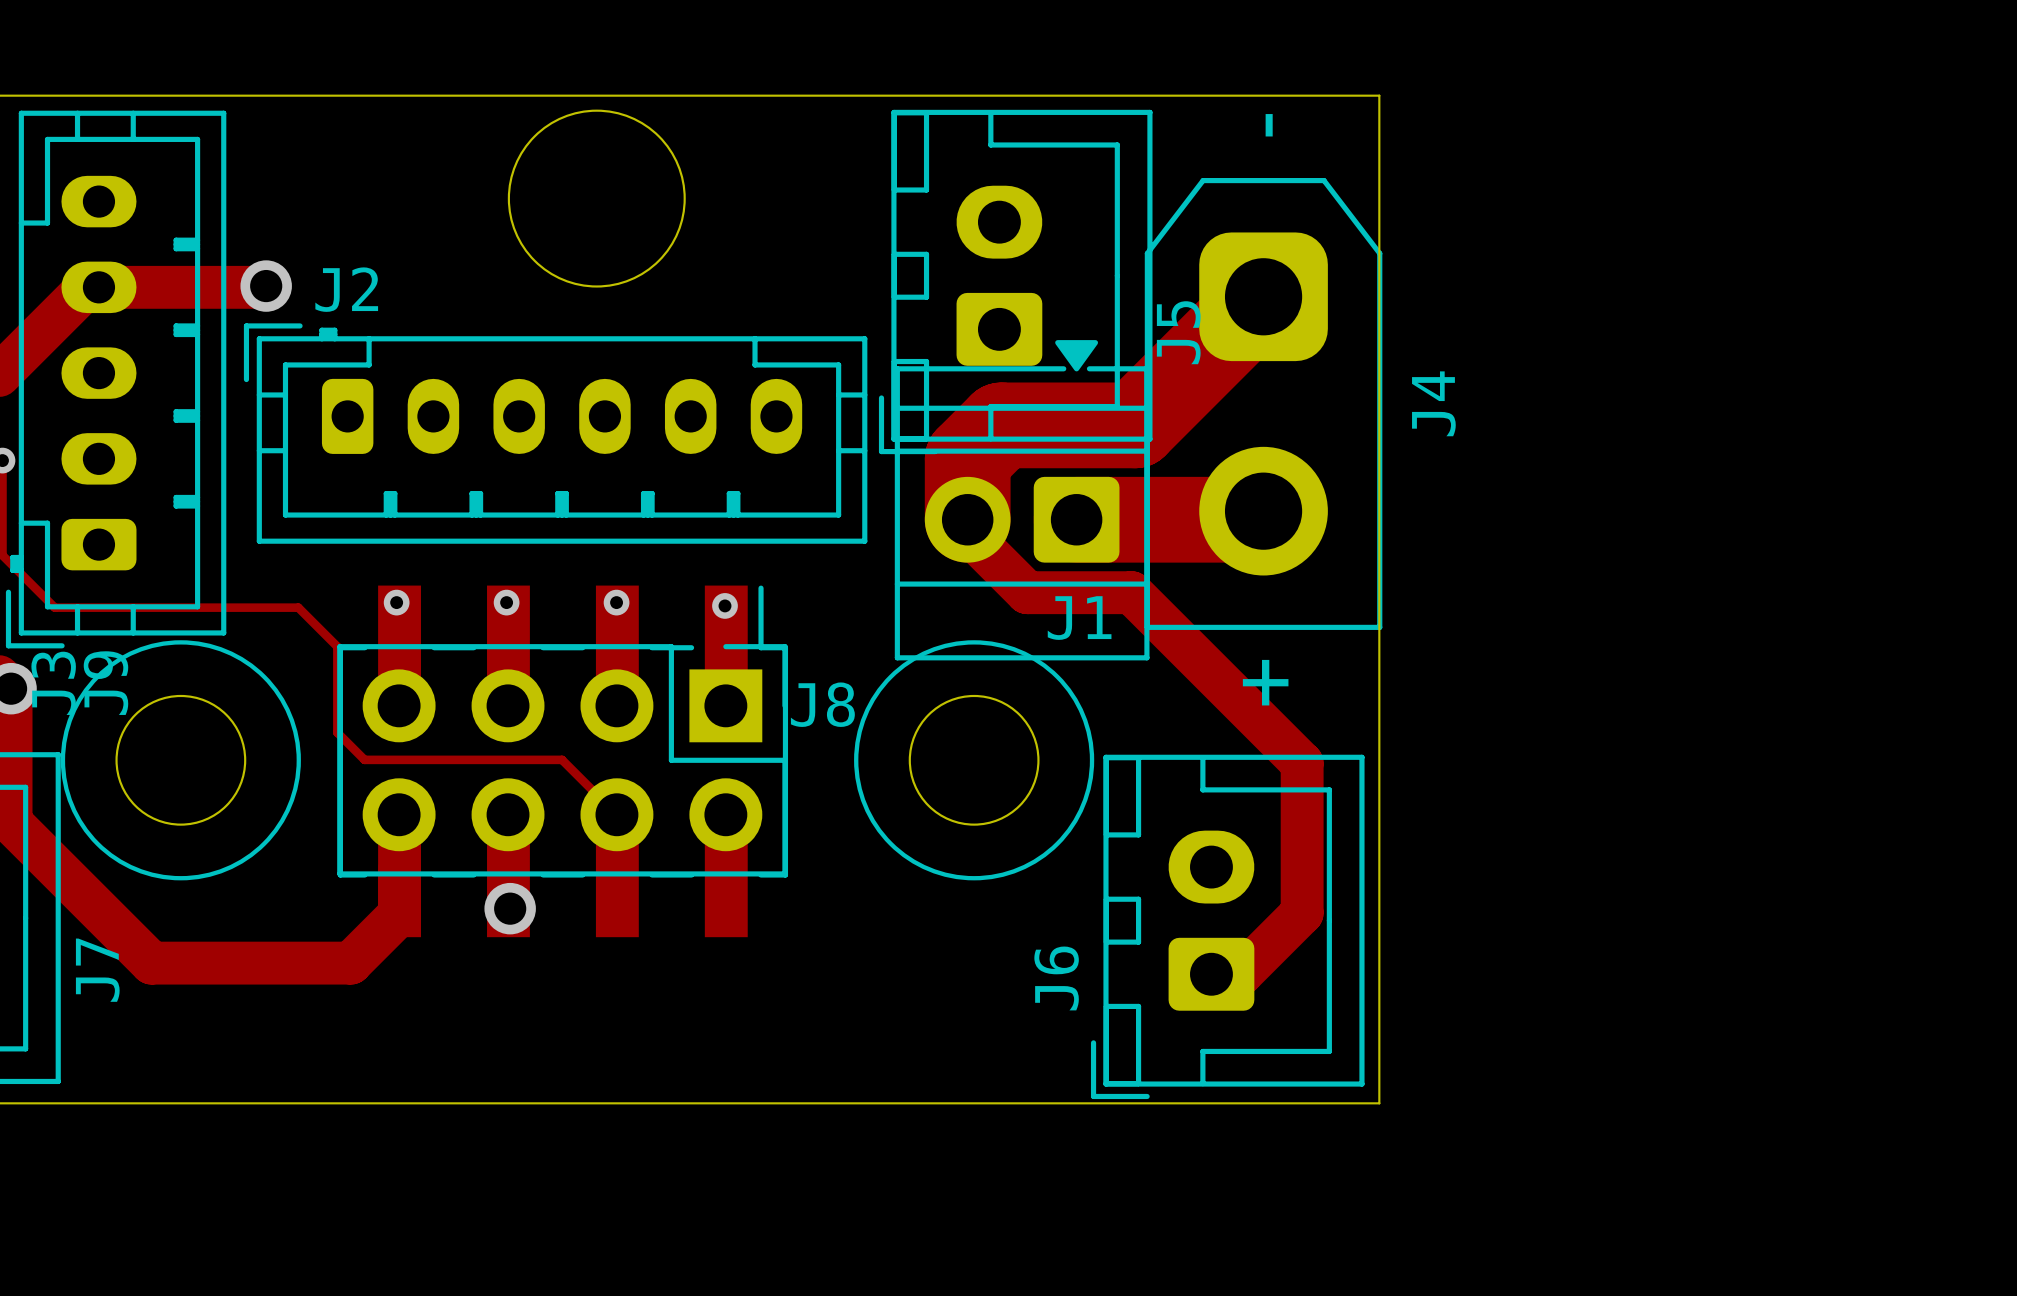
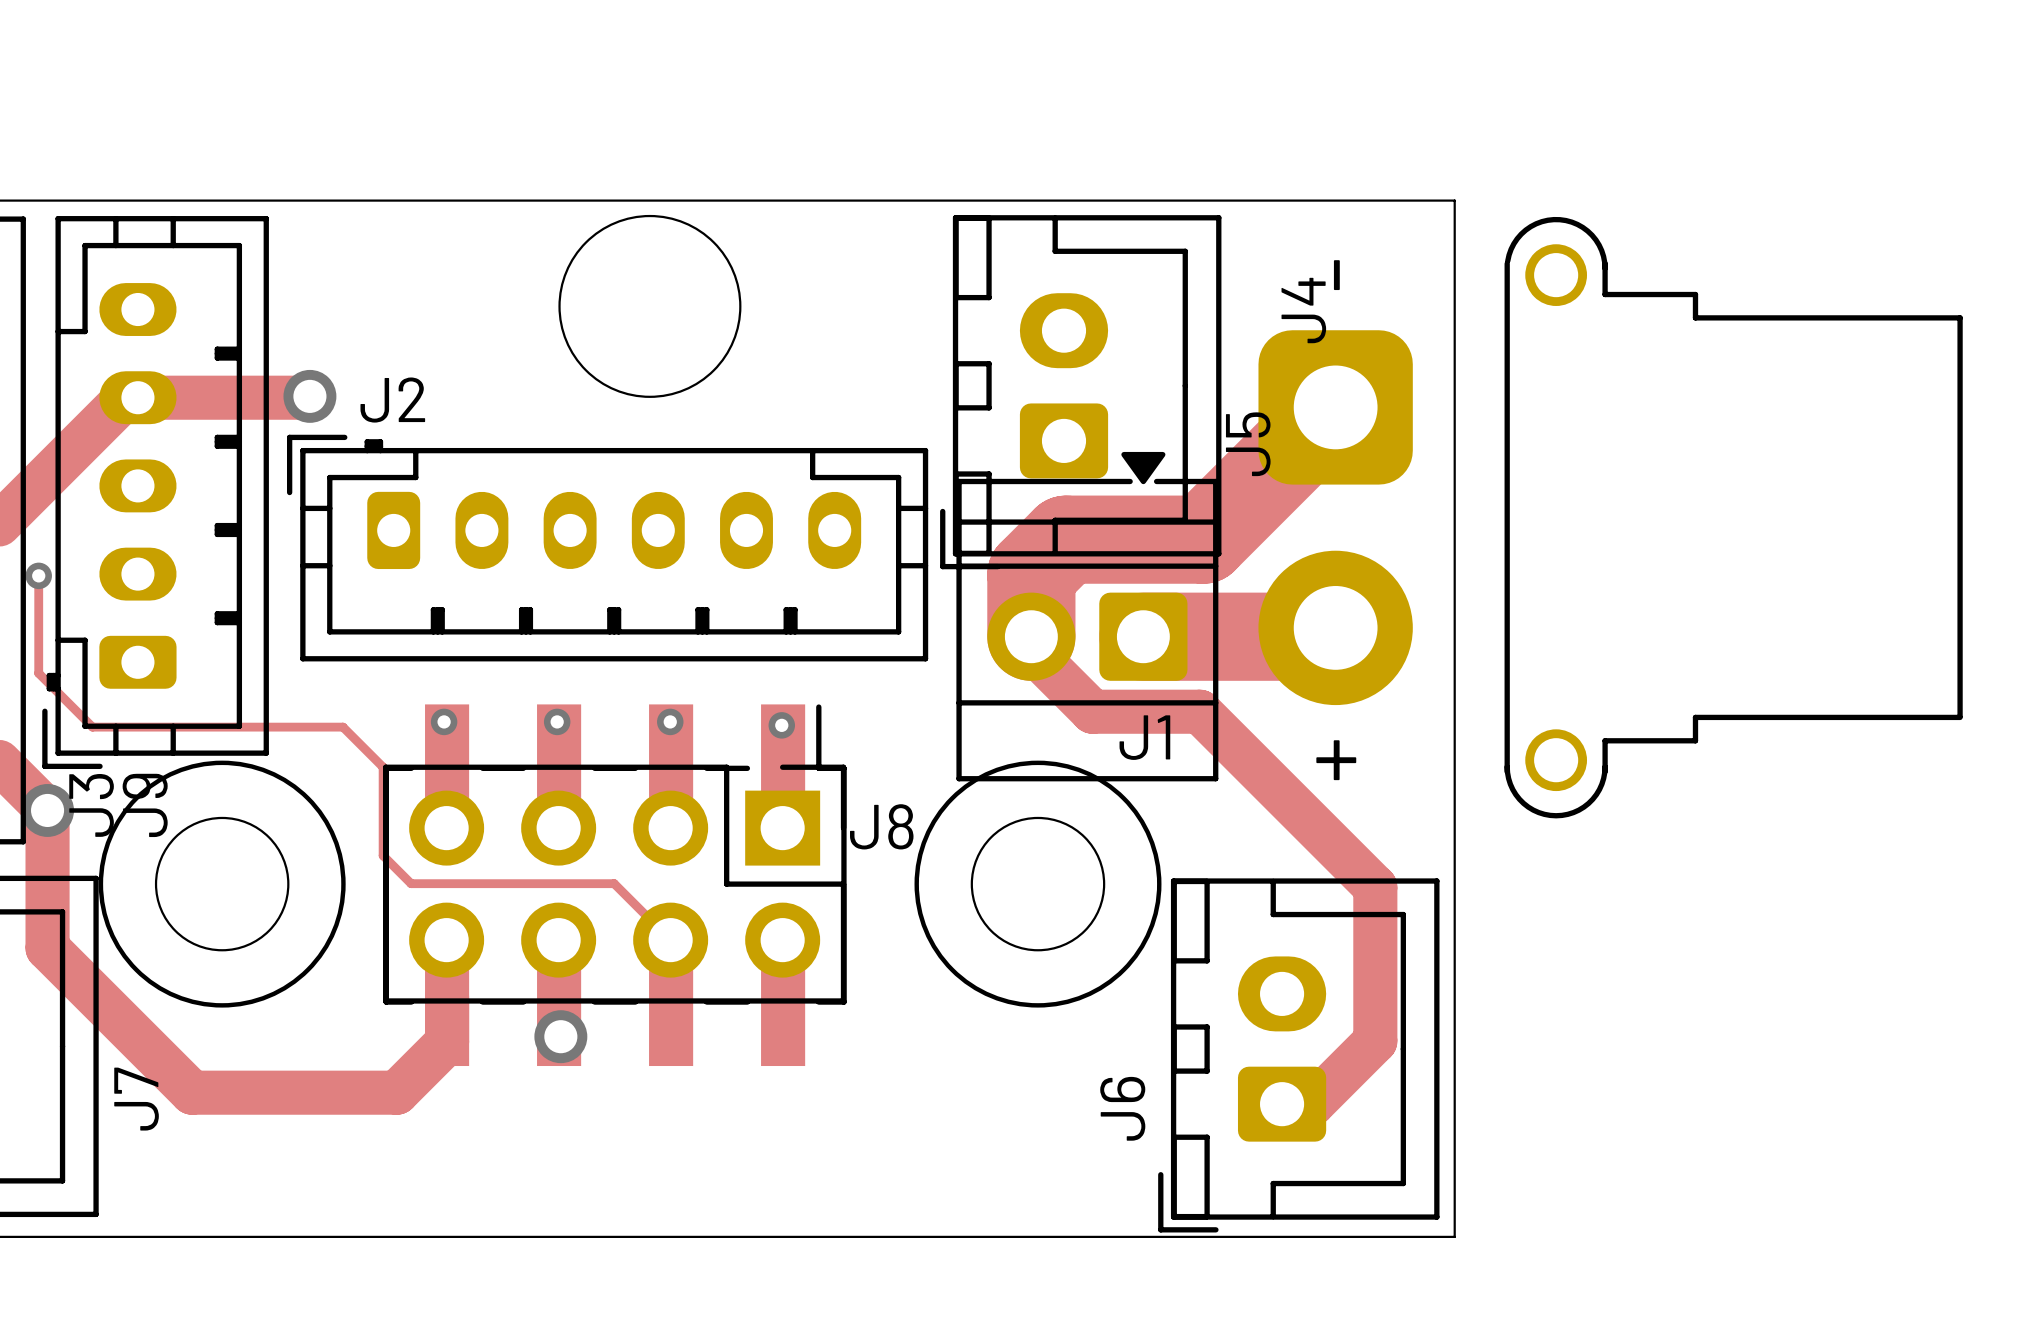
J4 footprint: [1144, 178, 1383, 630] -> [1258, 216, 1963, 819]
J4 name position: J4 (1433, 403) -> J4 (1303, 310)

